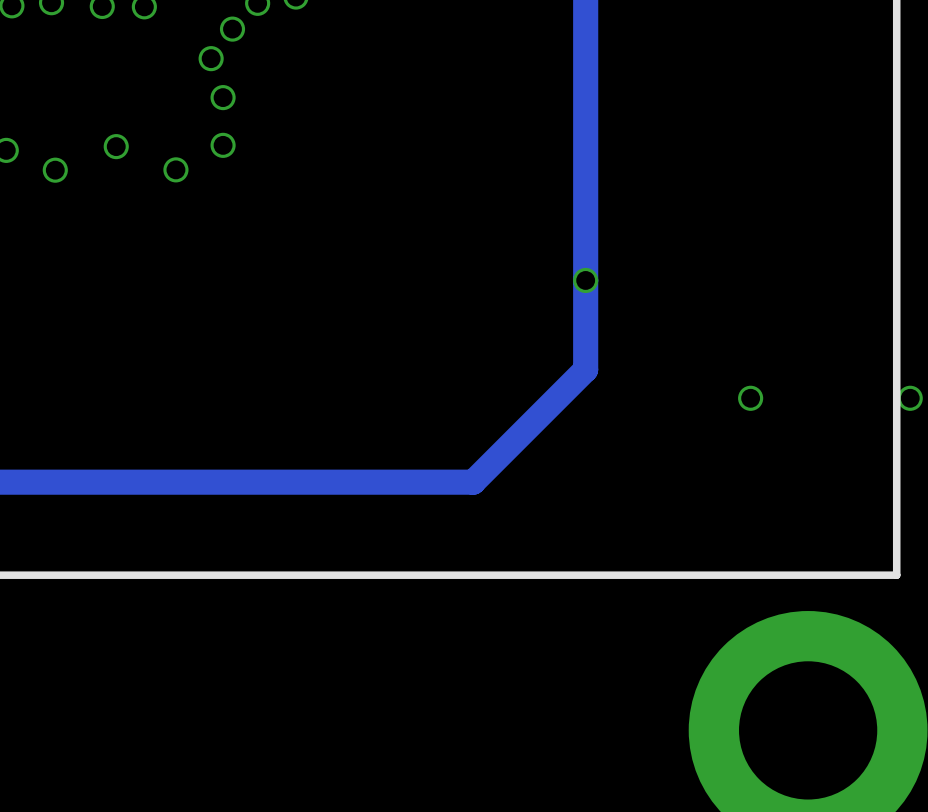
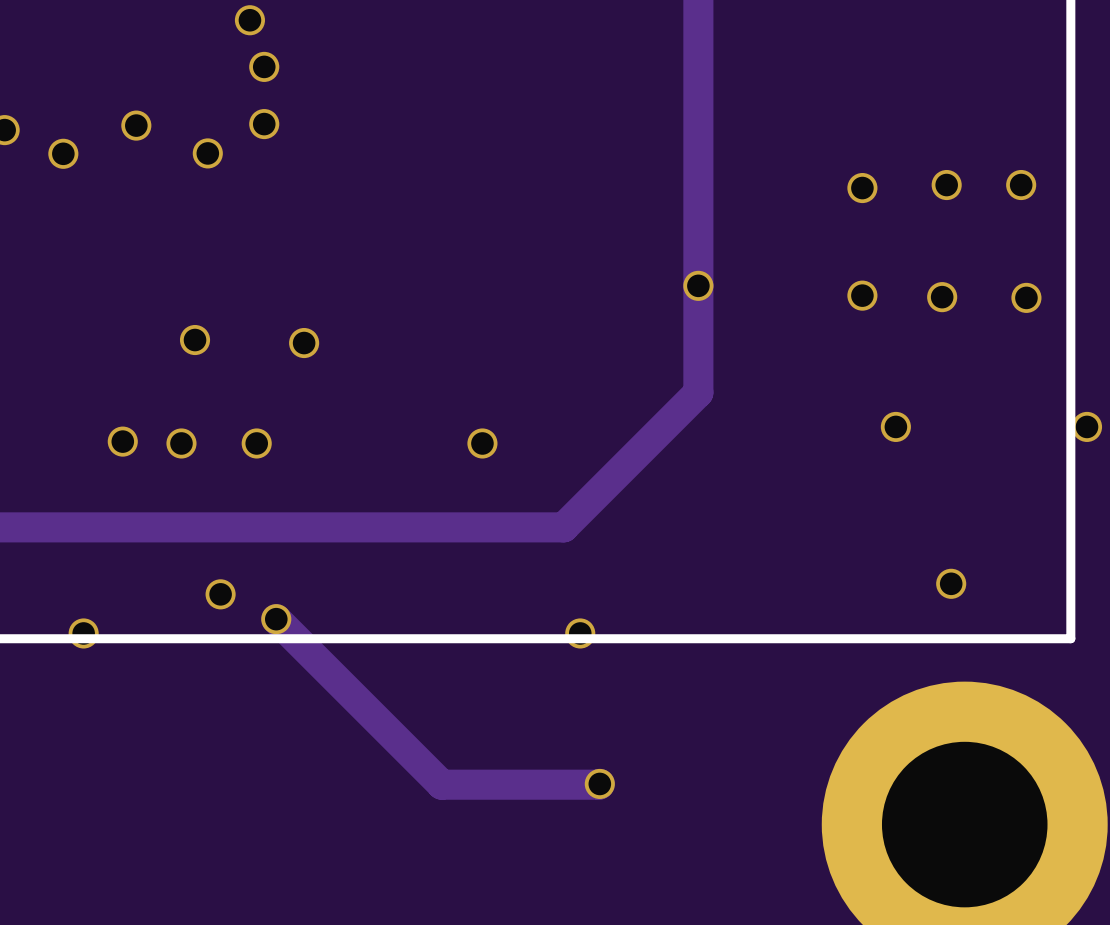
via: none -> (946, 185)
via: none -> (1021, 185)
via: none -> (862, 188)
via: none -> (862, 295)
via: none -> (942, 297)
via: none -> (1026, 297)
via: none -> (195, 340)
via: none -> (304, 343)
via: none -> (122, 441)
via: none -> (181, 443)
via: none -> (256, 443)
via: none -> (482, 443)
via: none -> (951, 583)
via: none -> (220, 594)
track: none -> (276, 619) (441, 784) (599, 784)
via: none -> (276, 619)
via: none -> (83, 633)
via: none -> (580, 633)
via: none -> (599, 783)

